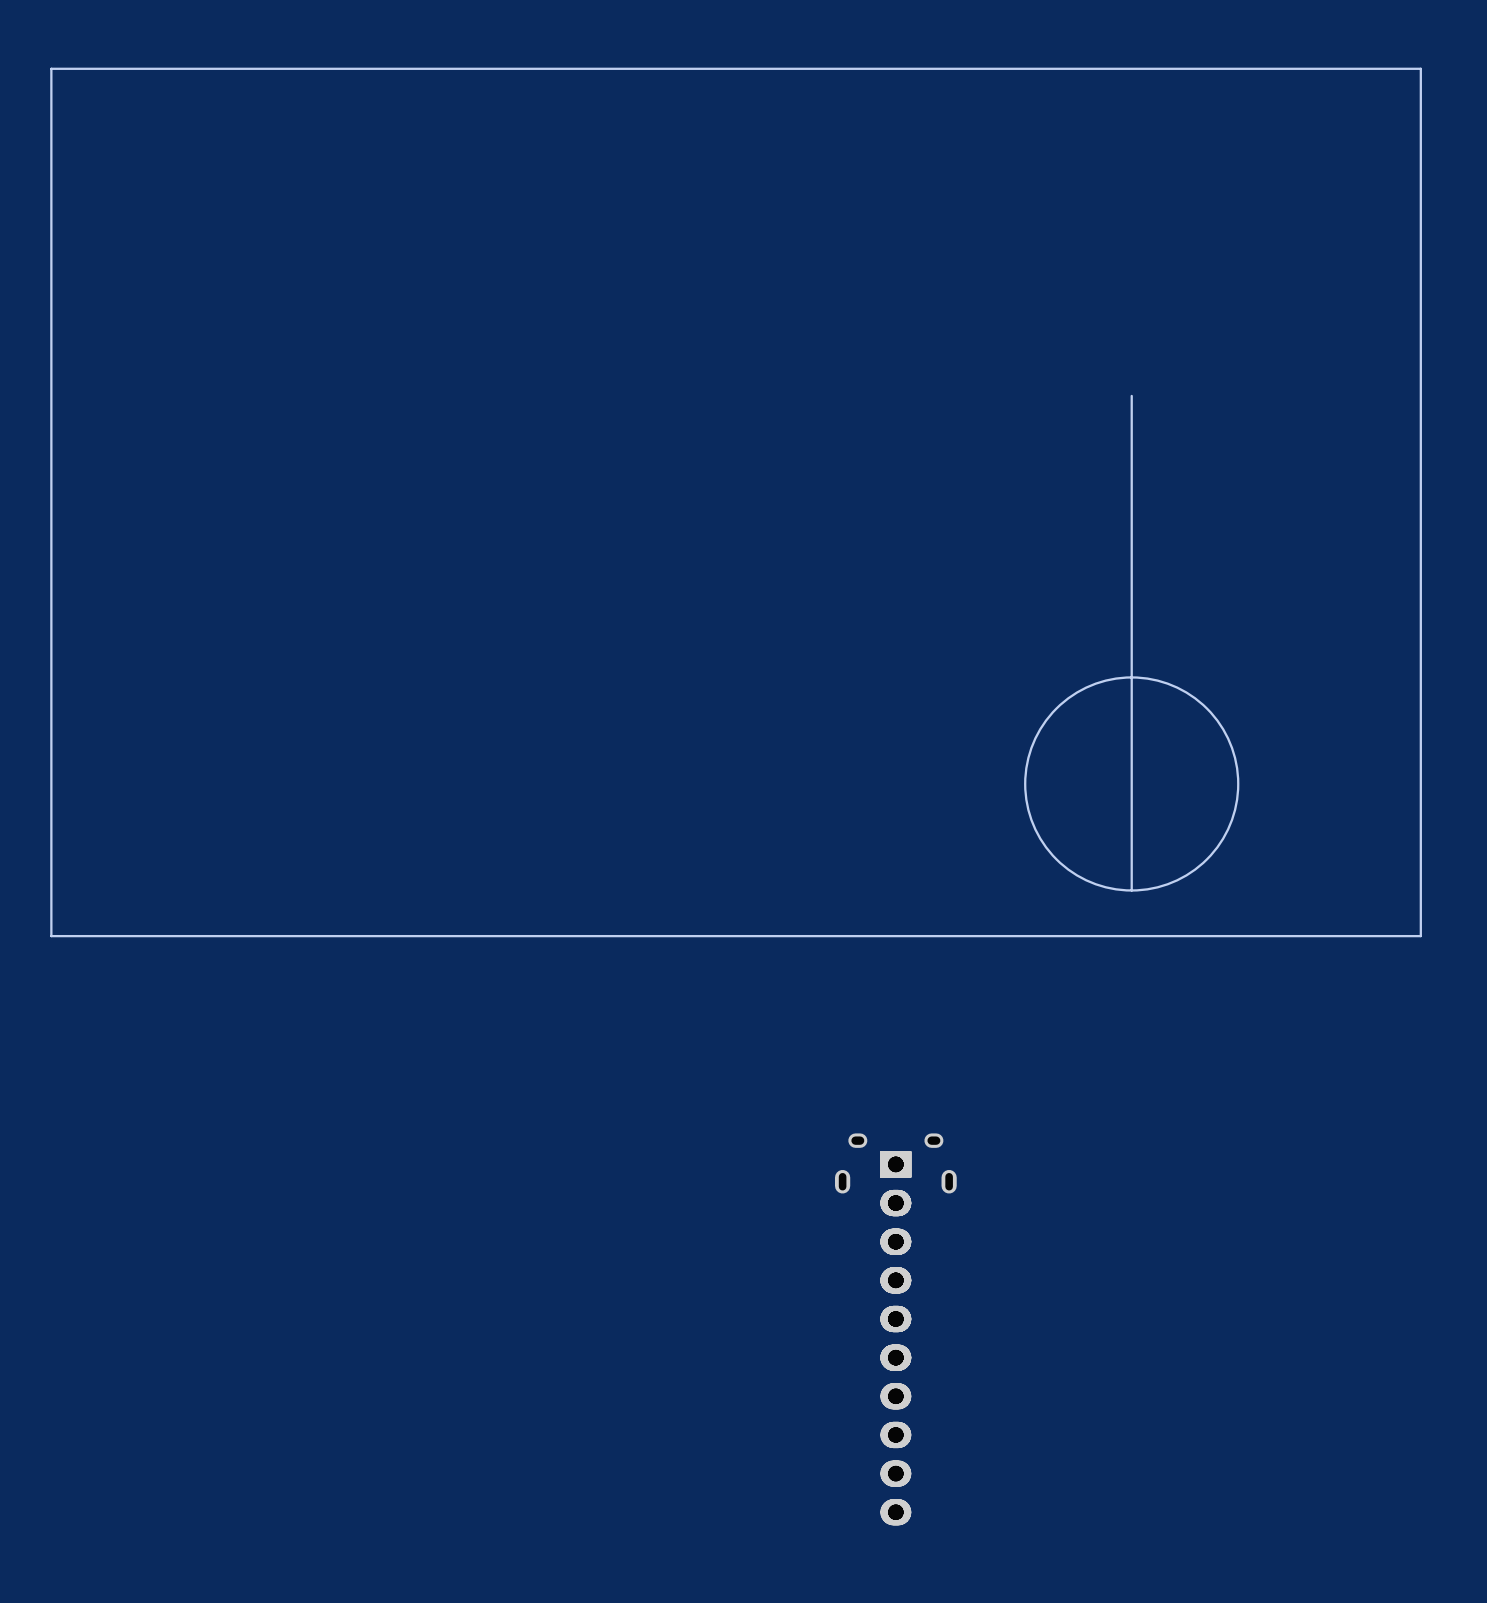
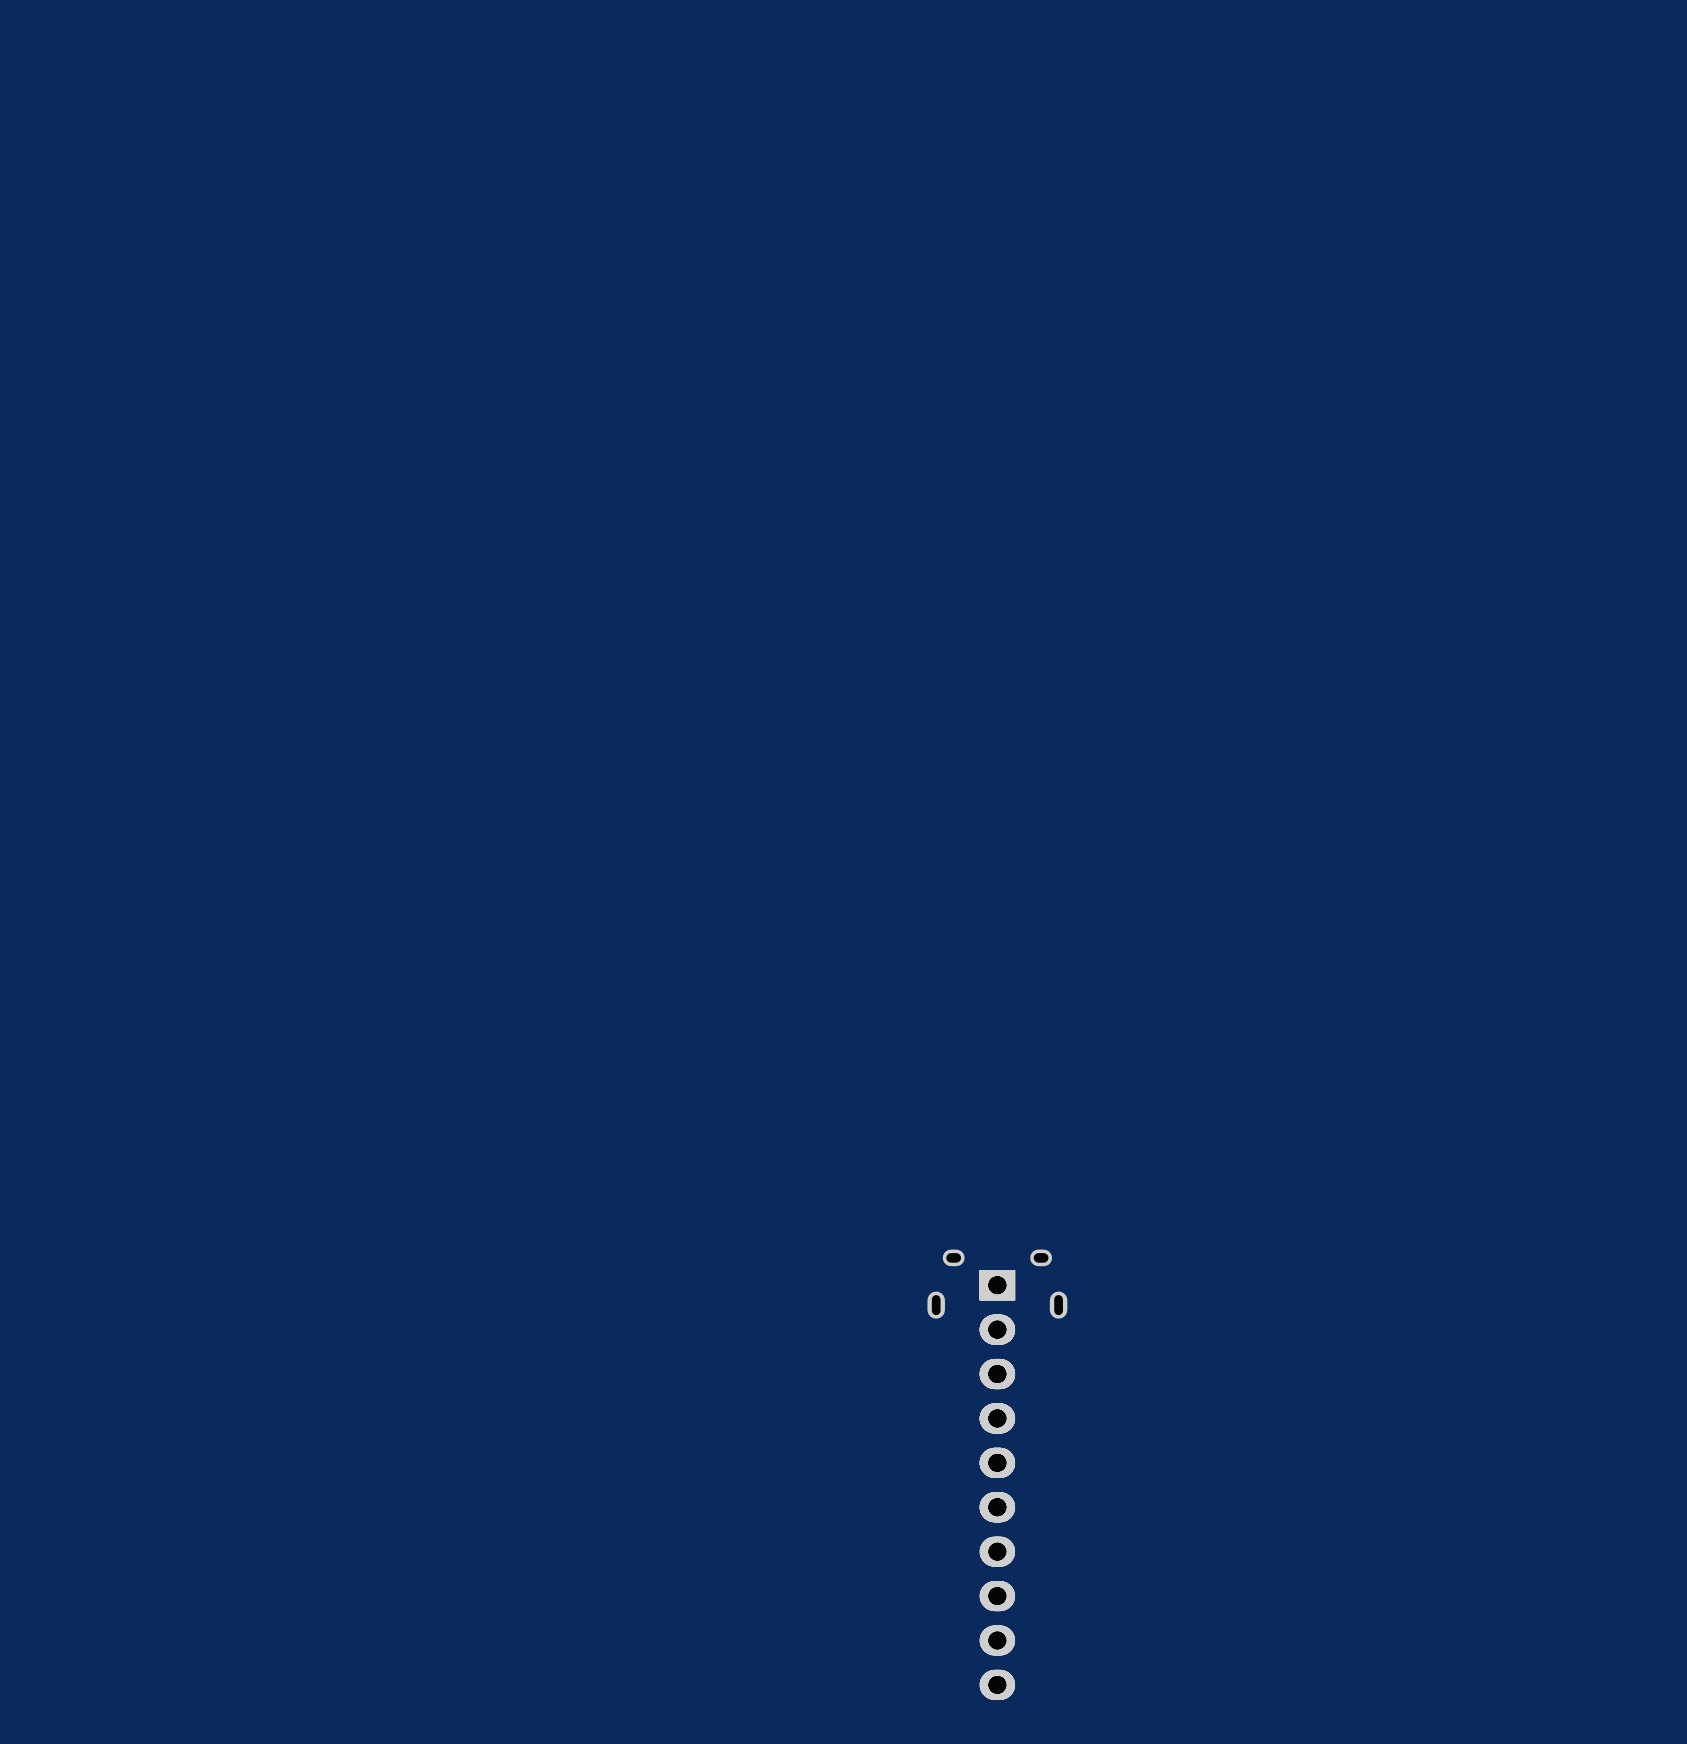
board edge: (1420, 68) (1420, 936) (51, 936) (51, 68) (1420, 68) -> none
board edge: (1131, 395) (1131, 890) -> none
round board edge: [1024, 676, 1240, 892] -> none

